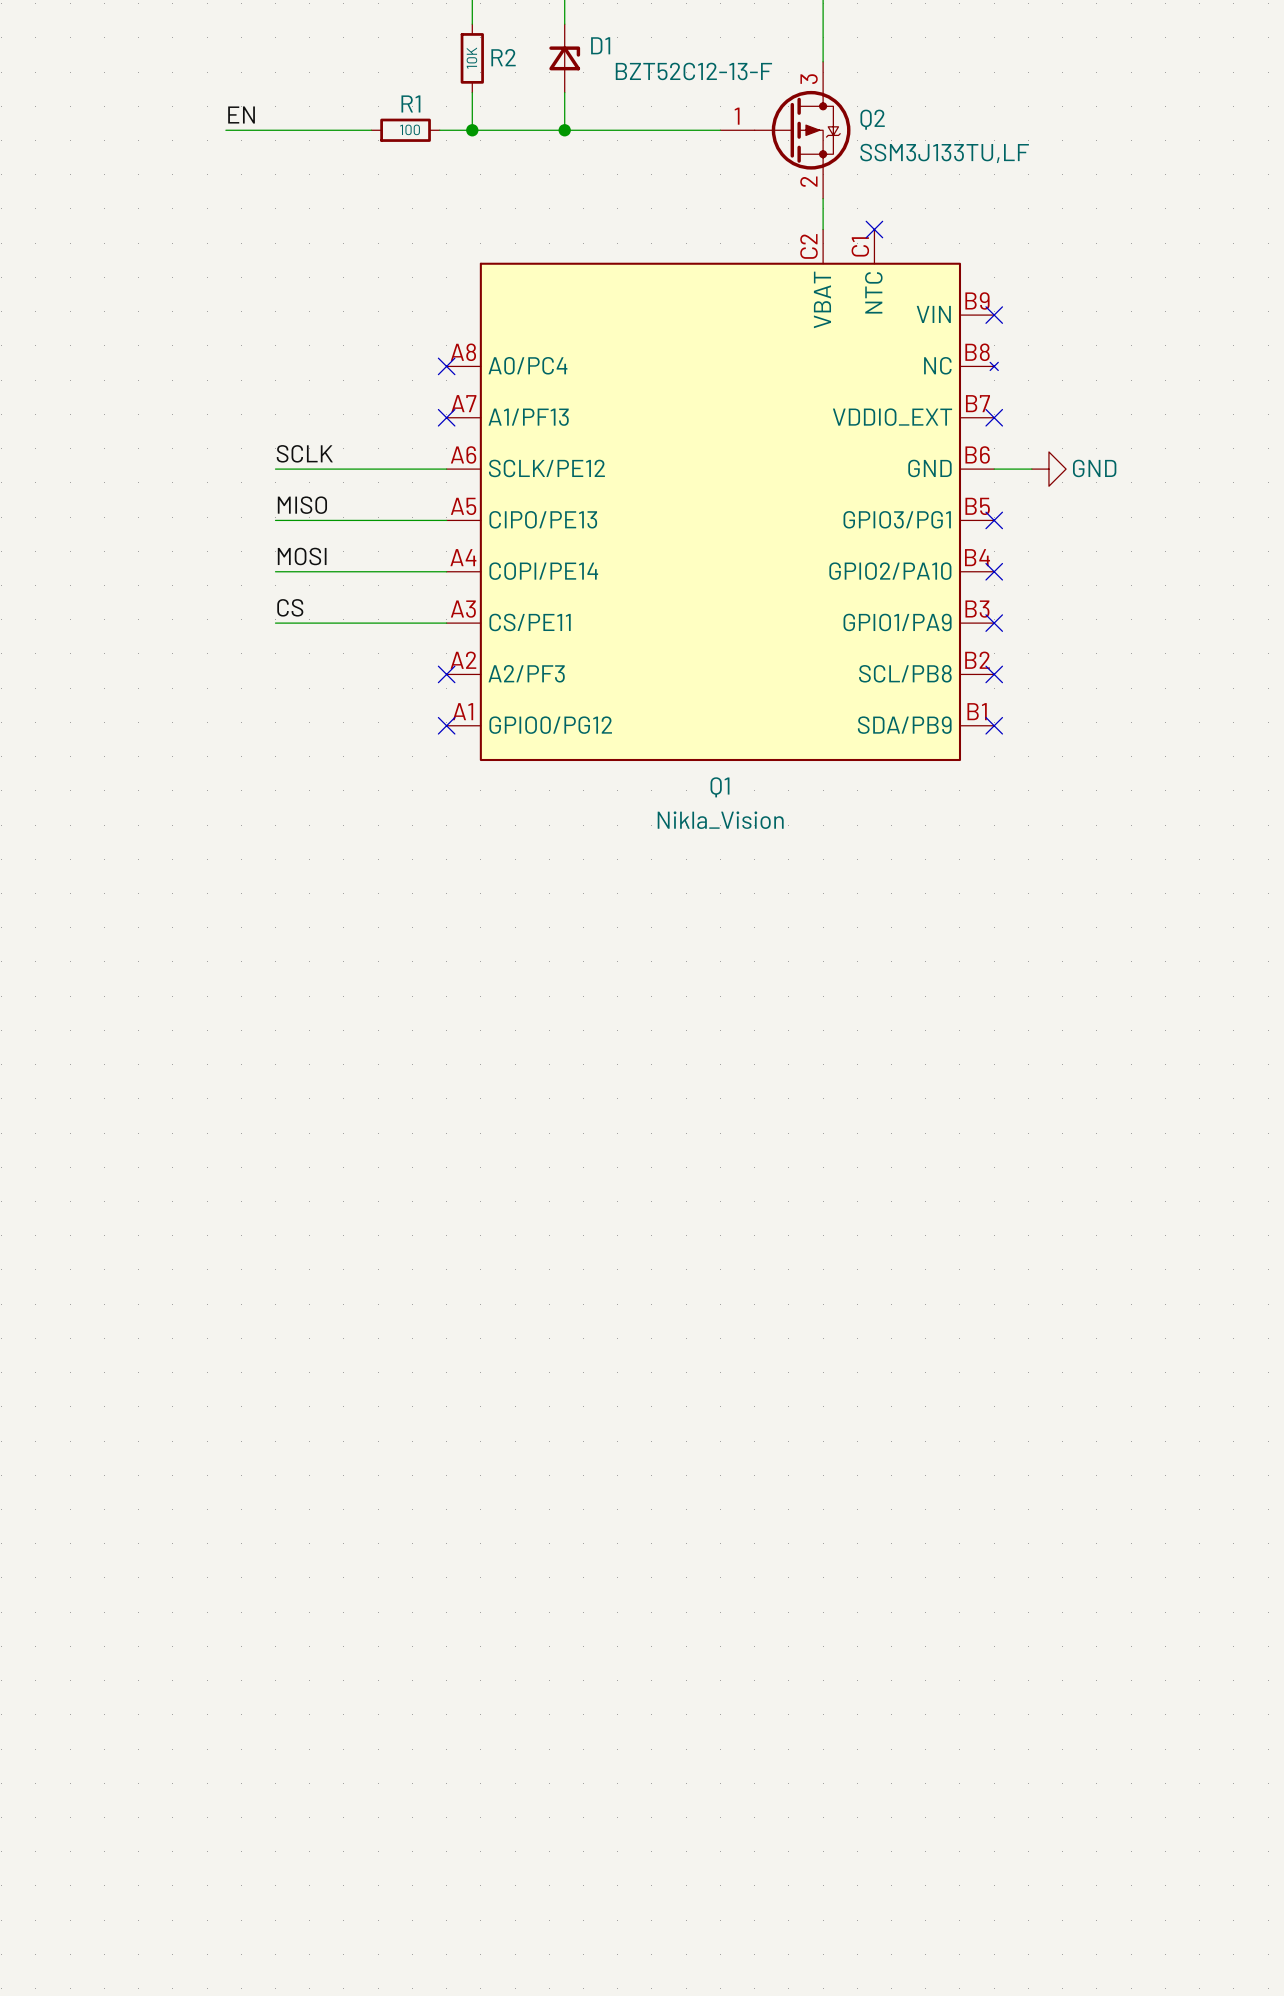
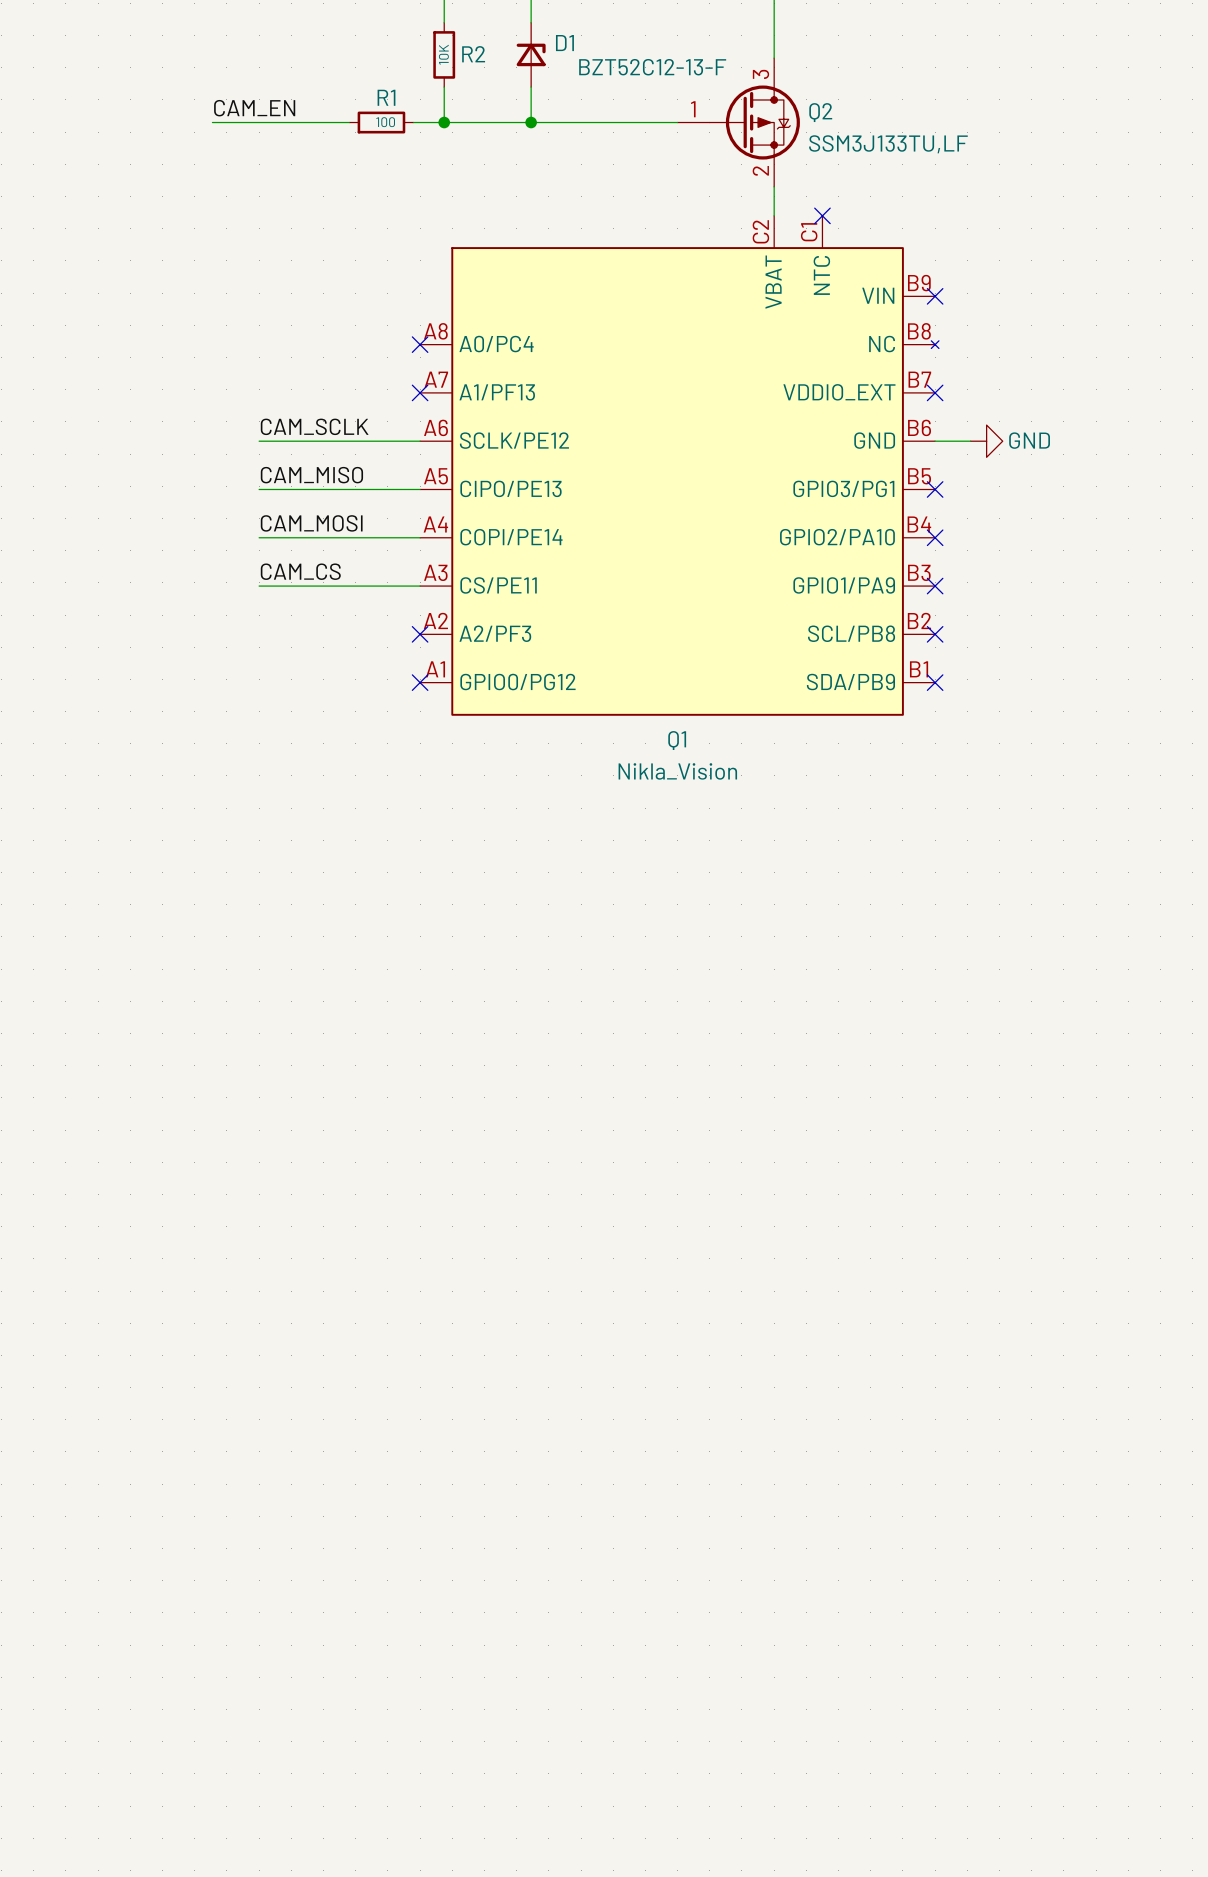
label: EN (241, 115) -> CAM_EN (254, 108)
label: SCLK (304, 453) -> CAM_SCLK (314, 426)
label: MISO (302, 505) -> CAM_MISO (311, 475)
label: MOSI (302, 556) -> CAM_MOSI (311, 523)
label: CS (290, 607) -> CAM_CS (300, 571)

